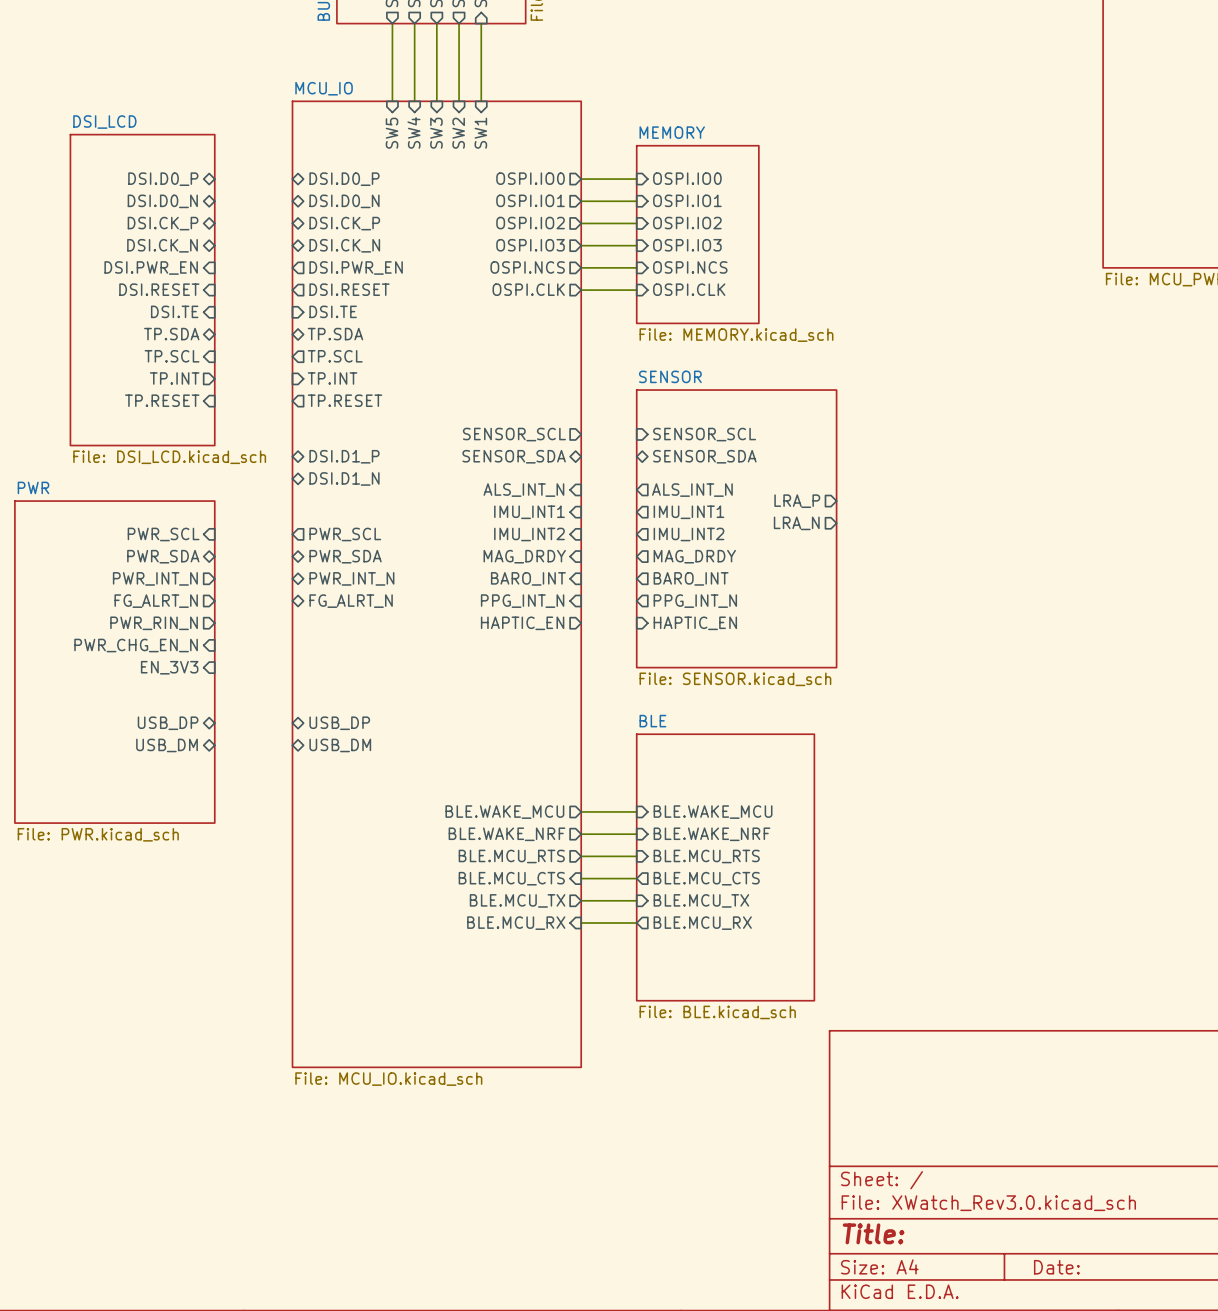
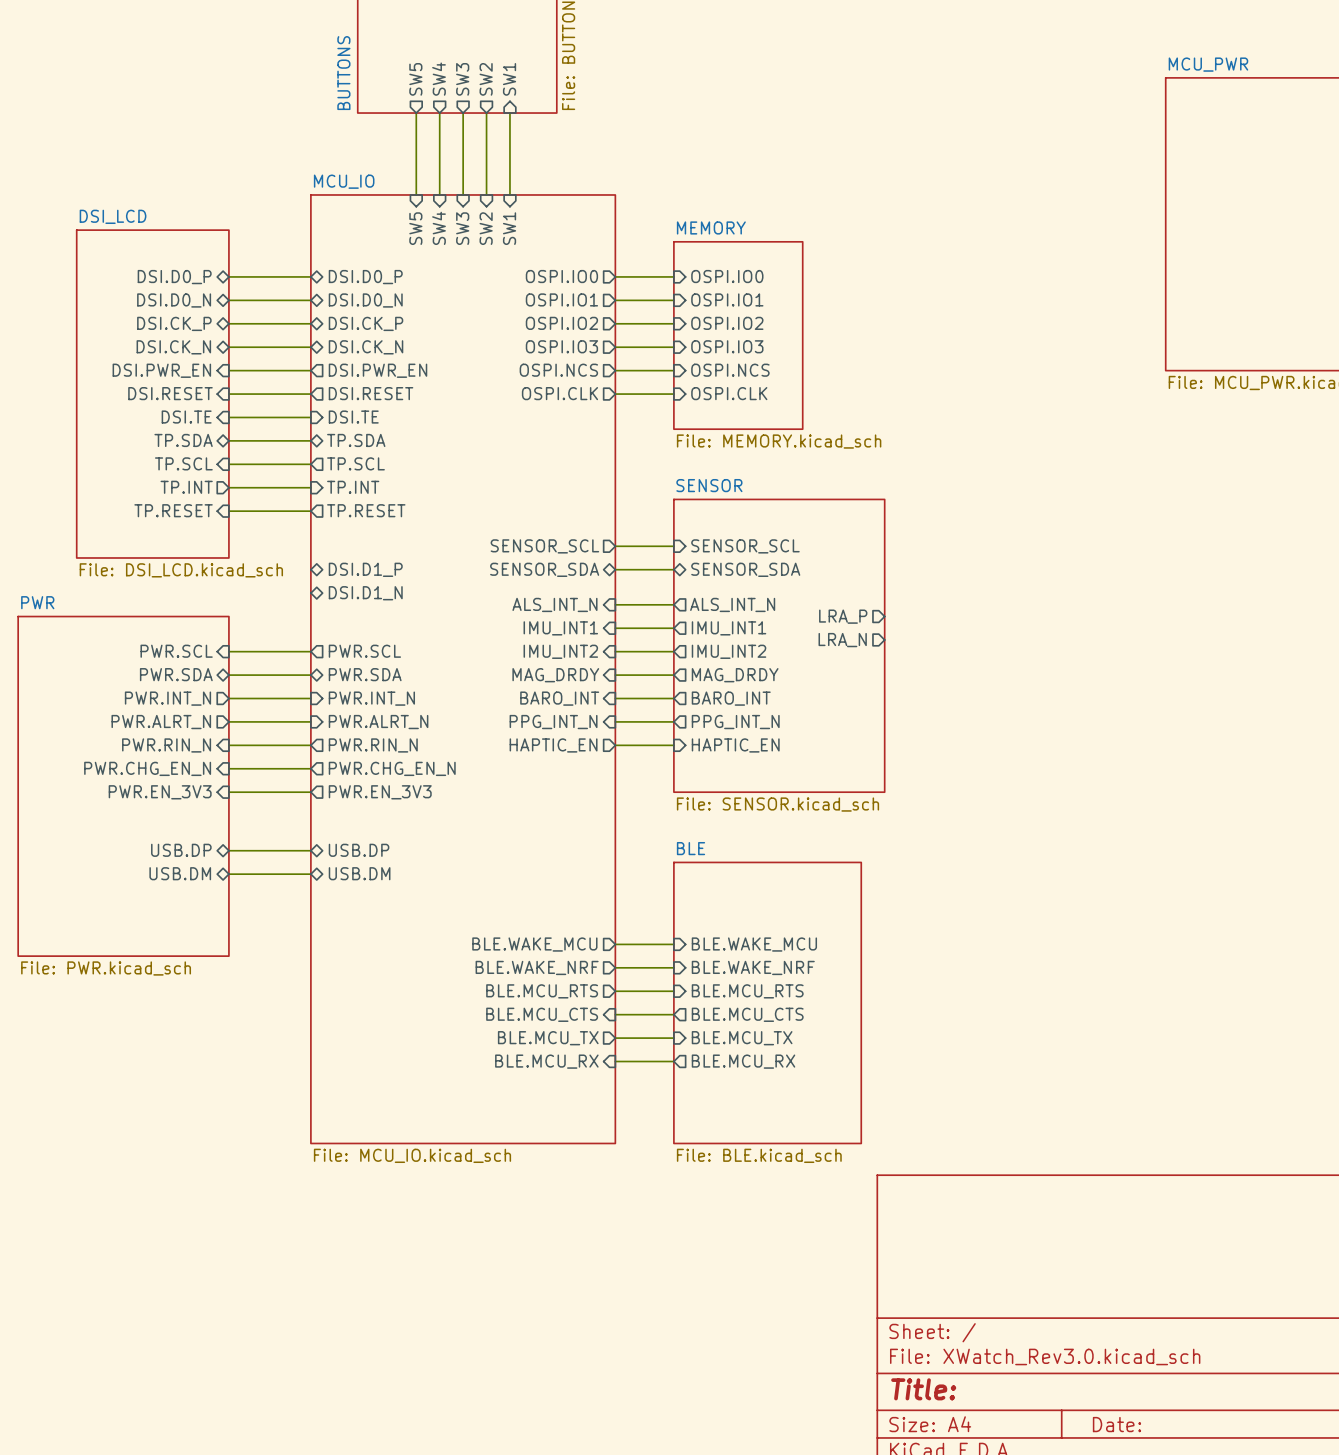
wire: none -> (228, 276) (310, 276)
wire: none -> (228, 300) (310, 300)
wire: none -> (228, 323) (310, 323)
wire: none -> (228, 347) (310, 347)
wire: none -> (228, 370) (310, 370)
wire: none -> (228, 394) (310, 394)
wire: none -> (228, 417) (310, 417)
wire: none -> (228, 440) (310, 440)
wire: none -> (228, 464) (310, 464)
wire: none -> (228, 487) (310, 487)
wire: none -> (228, 511) (310, 511)
wire: none -> (615, 546) (673, 546)
wire: none -> (615, 569) (673, 569)
wire: none -> (615, 604) (673, 604)
wire: none -> (615, 628) (673, 628)
sheet pin: PWR_SCL (163, 534) -> PWR.SCL (176, 651)
wire: none -> (228, 651) (310, 651)
sheet pin: PWR_SCL (345, 534) -> PWR.SCL (364, 651)
wire: none -> (615, 651) (673, 651)
sheet MCU_IO: none -> File: MCU_IO.kicad_sch (463, 669)
sheet pin: PWR_SDA (163, 556) -> PWR.SDA (176, 674)
wire: none -> (228, 675) (310, 675)
sheet pin: PWR_SDA (345, 556) -> PWR.SDA (365, 674)
wire: none -> (615, 675) (673, 675)
sheet pin: PWR_INT_N (155, 578) -> PWR.INT_N (167, 698)
wire: none -> (228, 698) (310, 698)
sheet pin shape: bidirectional (351, 578) -> input (371, 698)
sheet pin: PWR_INT_N (351, 578) -> PWR.INT_N (371, 698)
wire: none -> (615, 698) (673, 698)
sheet MCU_IO: File: MCU_IO.kicad_sch (436, 584) -> none
wire: none -> (228, 721) (310, 721)
wire: none -> (615, 721) (673, 721)
sheet pin: FG_ALRT_N (156, 601) -> PWR.ALRT_N (161, 722)
sheet pin shape: bidirectional (351, 601) -> input (378, 722)
sheet pin: FG_ALRT_N (351, 601) -> PWR.ALRT_N (378, 722)
sheet pin shape: output (154, 623) -> input (166, 745)
sheet pin: PWR_RIN_N (154, 623) -> PWR.RIN_N (166, 745)
wire: none -> (228, 745) (310, 745)
sheet pin: none -> PWR.RIN_N (373, 745)
wire: none -> (615, 745) (673, 745)
sheet pin: PWR_CHG_EN_N (136, 645) -> PWR.CHG_EN_N (147, 768)
wire: none -> (228, 768) (310, 768)
sheet pin: none -> PWR.CHG_EN_N (392, 768)
sheet pin: EN_3V3 (169, 667) -> PWR.EN_3V3 (160, 792)
wire: none -> (228, 792) (310, 792)
sheet pin: none -> PWR.EN_3V3 (380, 792)
sheet pin: USB_DP (168, 723) -> USB.DP (181, 850)
wire: none -> (228, 850) (310, 850)
sheet pin: USB_DP (339, 723) -> USB.DP (359, 850)
sheet pin: USB_DM (167, 745) -> USB.DM (180, 873)
wire: none -> (228, 874) (310, 874)
sheet pin: USB_DM (340, 745) -> USB.DM (359, 873)

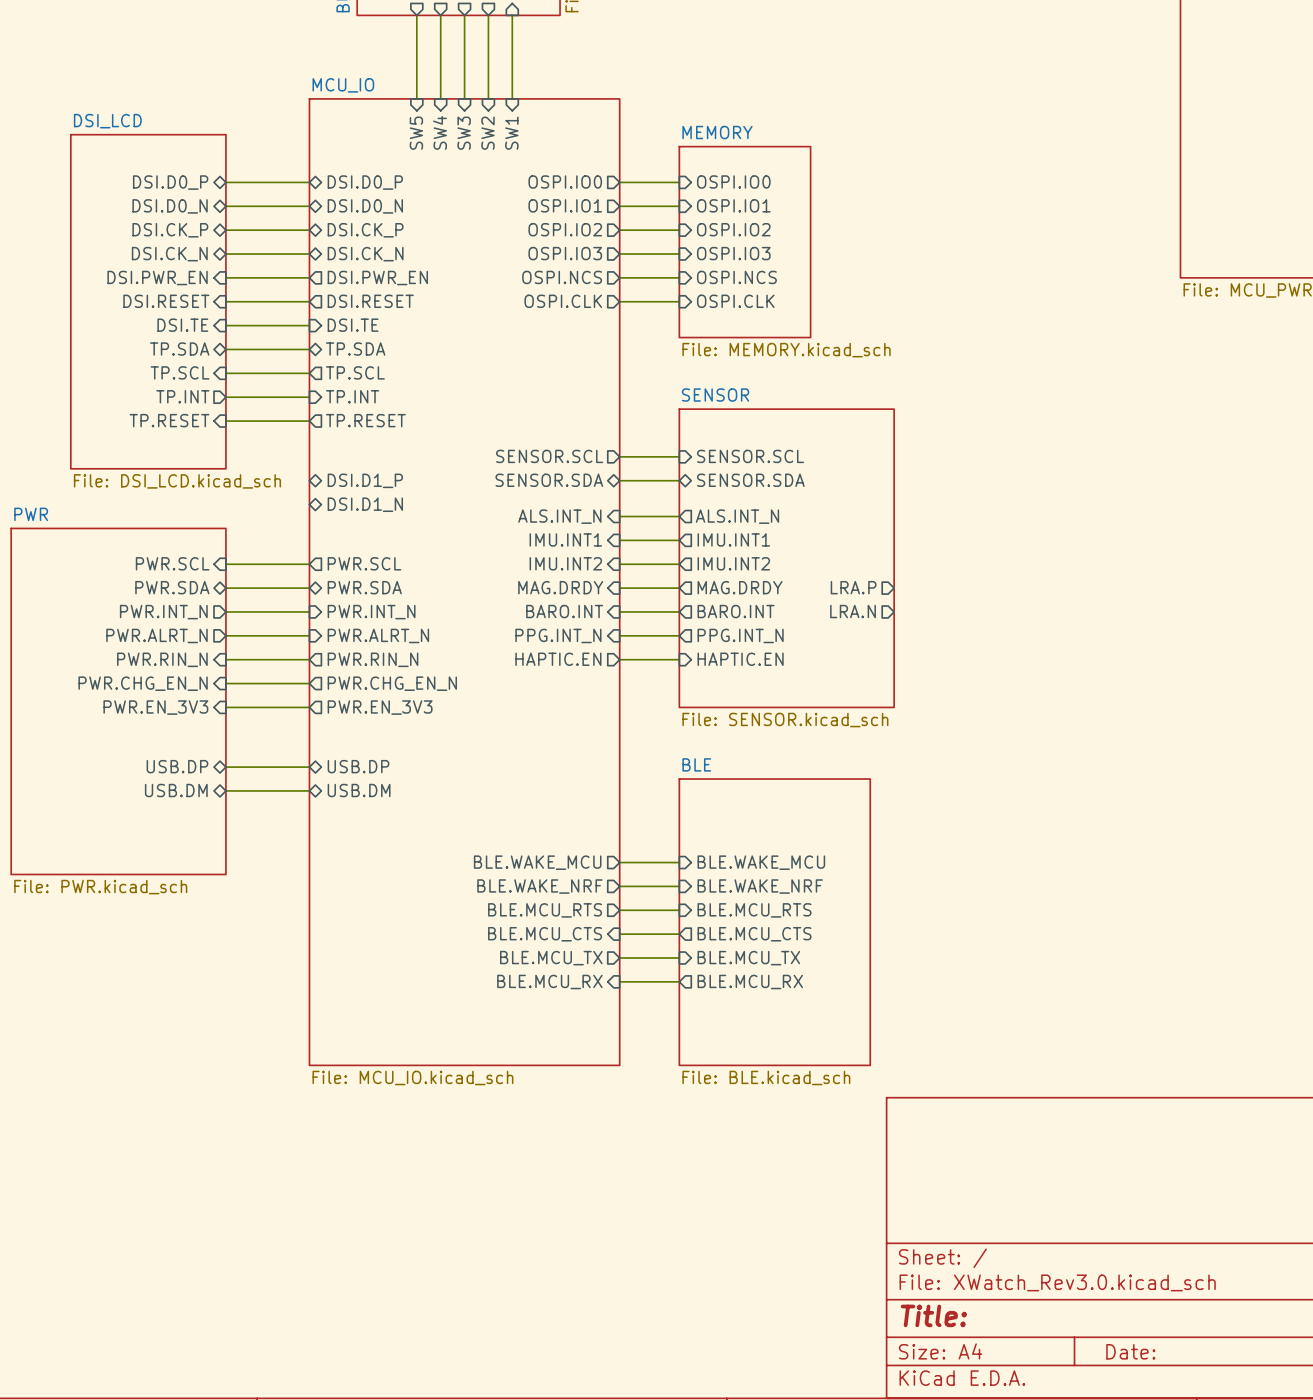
sheet pin: SENSOR_SCL (544, 546) -> SENSOR.SCL (549, 456)
sheet pin: SENSOR_SCL (745, 546) -> SENSOR.SCL (750, 456)
sheet pin: SENSOR_SDA (544, 569) -> SENSOR.SDA (549, 480)
sheet pin: SENSOR_SDA (745, 569) -> SENSOR.SDA (750, 480)
sheet pin: ALS_INT_N (554, 604) -> ALS.INT_N (559, 516)
sheet pin: ALS_INT_N (732, 604) -> ALS.INT_N (737, 516)
sheet pin: LRA_P (843, 616) -> none
sheet pin: IMU_INT1 (560, 628) -> IMU.INT1 (565, 539)
sheet pin: IMU_INT1 (729, 628) -> IMU.INT1 (733, 539)
sheet pin: LRA_N (842, 640) -> none
sheet pin: IMU_INT2 (560, 651) -> IMU.INT2 (565, 563)
sheet pin: IMU_INT2 (729, 651) -> IMU.INT2 (733, 563)
sheet pin: none -> LRA.P (853, 587)
sheet pin: MAG_DRDY (555, 675) -> MAG.DRDY (560, 587)
sheet pin: MAG_DRDY (735, 675) -> MAG.DRDY (740, 587)
sheet pin: BARO_INT (559, 698) -> BARO.INT (564, 611)
sheet pin: BARO_INT (731, 698) -> BARO.INT (736, 611)
sheet pin: none -> LRA.N (853, 611)
sheet pin: PPG_INT_N (553, 722) -> PPG.INT_N (558, 635)
sheet pin: PPG_INT_N (735, 722) -> PPG.INT_N (740, 635)
sheet pin: HAPTIC_EN (553, 745) -> HAPTIC.EN (558, 659)
sheet pin: HAPTIC_EN (735, 745) -> HAPTIC.EN (740, 659)

